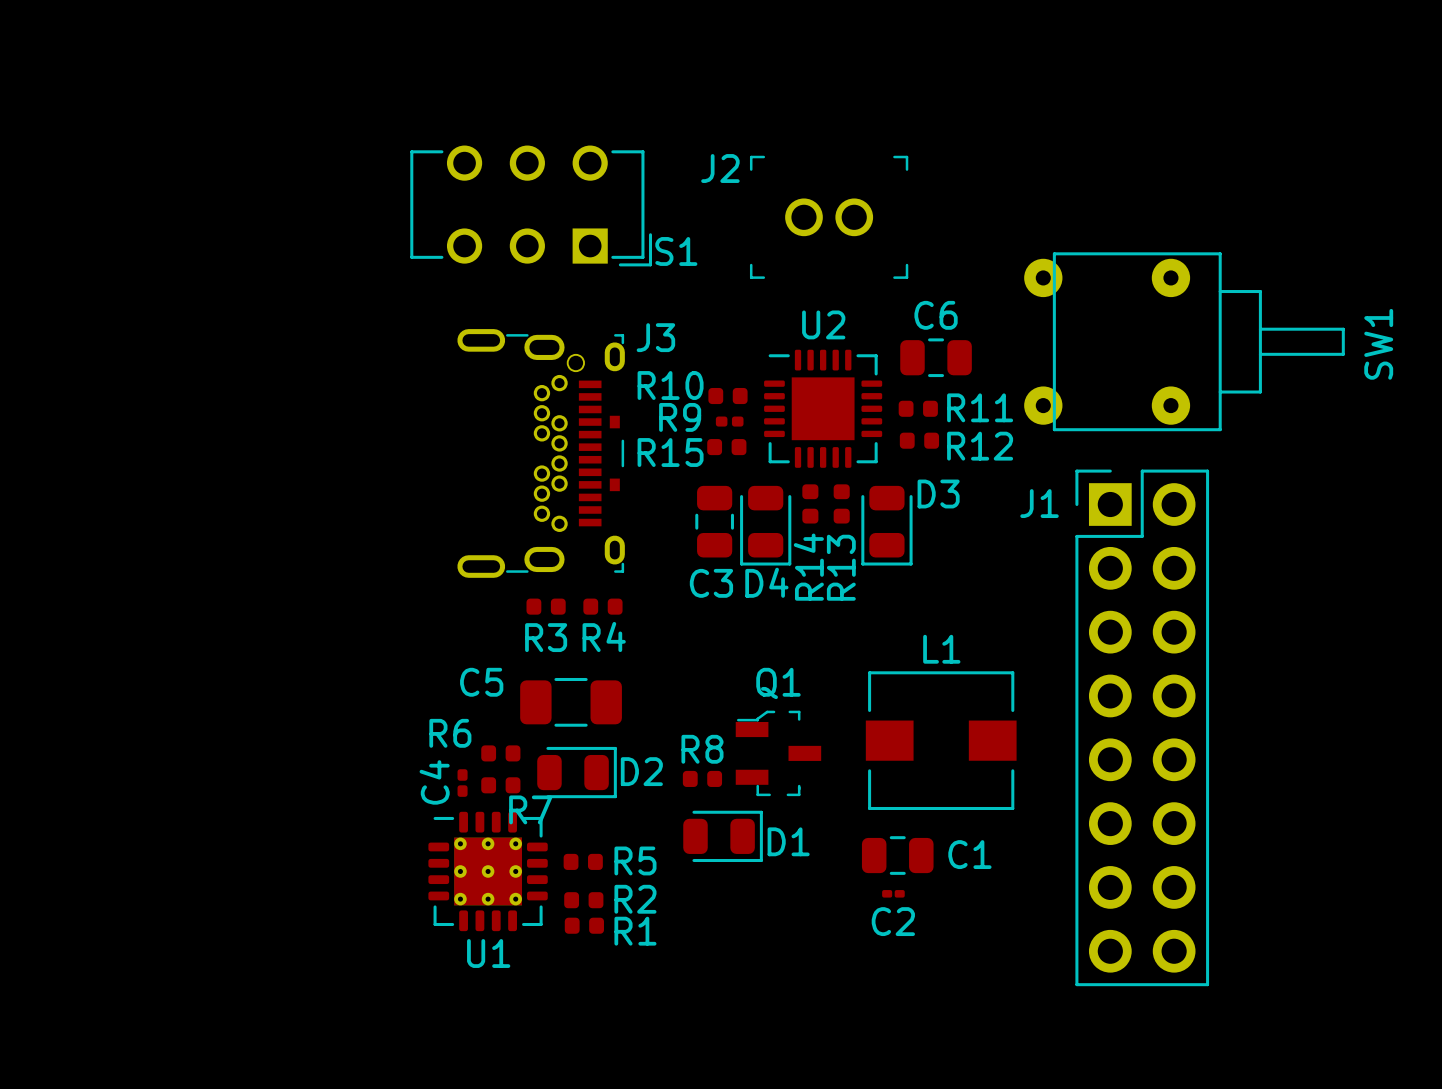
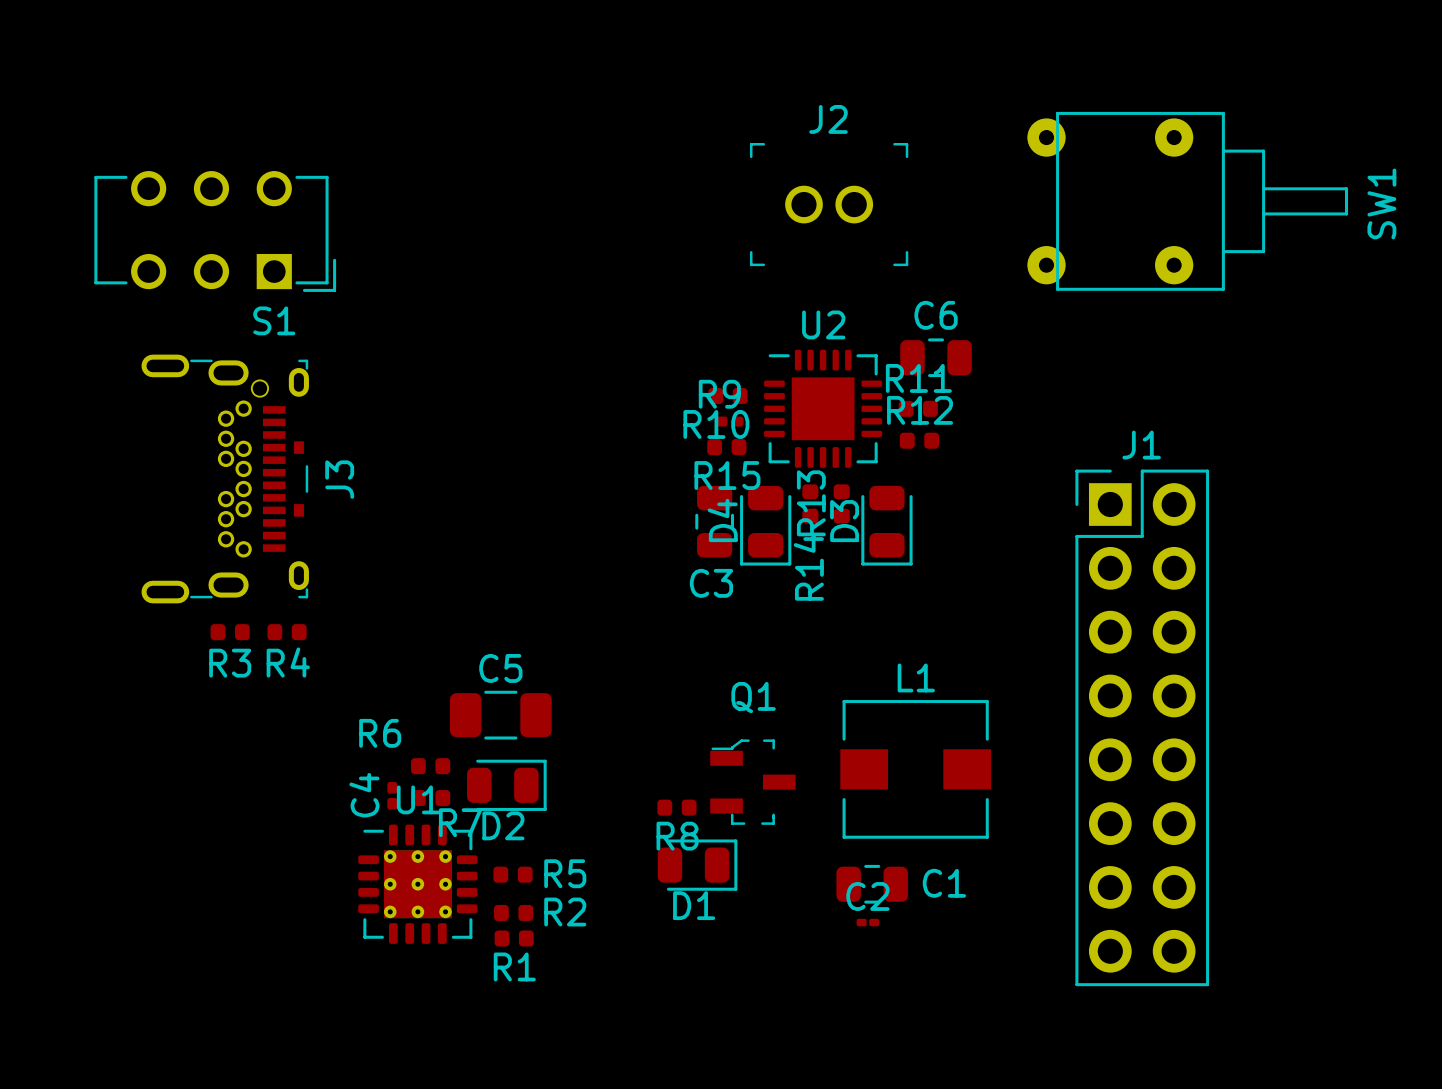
J2 name position: J2 (720, 168) -> J2 (828, 119)
S1 position: (531, 205) -> (215, 231)
J2 position: (829, 217) -> (829, 204)
S1 name position: S1 (676, 251) -> S1 (274, 320)
J3 name rotation: 0° (655, 337) -> 90° counterclockwise (339, 479)
J3 name position: J3 (655, 337) -> J3 (339, 479)
SW1 position: (1184, 341) -> (1187, 201)
R10 name position: R10 (670, 385) -> R10 (716, 424)
R11 name position: R11 (980, 407) -> R11 (918, 378)
R9 name position: R9 (680, 417) -> R9 (719, 394)
R12 name position: R12 (980, 446) -> R12 (920, 410)
R15 name position: R15 (670, 452) -> R15 (727, 475)
J3 position: (541, 453) -> (225, 478)
D3 name rotation: 0° (938, 494) -> 90° counterclockwise (844, 521)
D3 name position: D3 (938, 494) -> D3 (844, 521)
J1 name position: J1 (1039, 503) -> J1 (1141, 445)
R13 name position: R13 (841, 567) -> R13 (811, 503)
D4 name rotation: 0° (766, 582) -> 90° counterclockwise (722, 520)
D4 name position: D4 (766, 582) -> D4 (722, 520)
R3 position: (546, 606) -> (230, 632)
R4 position: (602, 606) -> (287, 632)
C5 name position: C5 (481, 682) -> C5 (500, 668)
Q1 name position: Q1 (778, 683) -> Q1 (753, 697)
C5 position: (571, 702) -> (500, 715)
R6 name position: R6 (450, 733) -> R6 (380, 733)
L1 position: (941, 740) -> (915, 769)
R8 name position: R8 (702, 749) -> R8 (677, 836)
R6 position: (500, 753) -> (430, 766)
Q1 position: (778, 753) -> (752, 782)
D2 name position: D2 (641, 771) -> D2 (503, 825)
D2 position: (577, 772) -> (506, 785)
R8 position: (702, 778) -> (676, 807)
C4 position: (462, 783) -> (392, 795)
R7 position: (500, 785) -> (430, 798)
D1 position: (723, 836) -> (697, 865)
D1 name position: D1 (788, 841) -> D1 (694, 905)
C1 position: (897, 855) -> (872, 884)
R5 position: (583, 861) -> (513, 874)
U1 position: (488, 871) -> (417, 884)
C2 position: (893, 893) -> (867, 922)
R2 position: (583, 900) -> (513, 912)
C2 name position: C2 (893, 921) -> C2 (867, 896)
R1 position: (584, 925) -> (514, 938)
R1 name position: R1 (635, 931) -> R1 (514, 966)
U1 name position: U1 (488, 953) -> U1 (418, 799)

